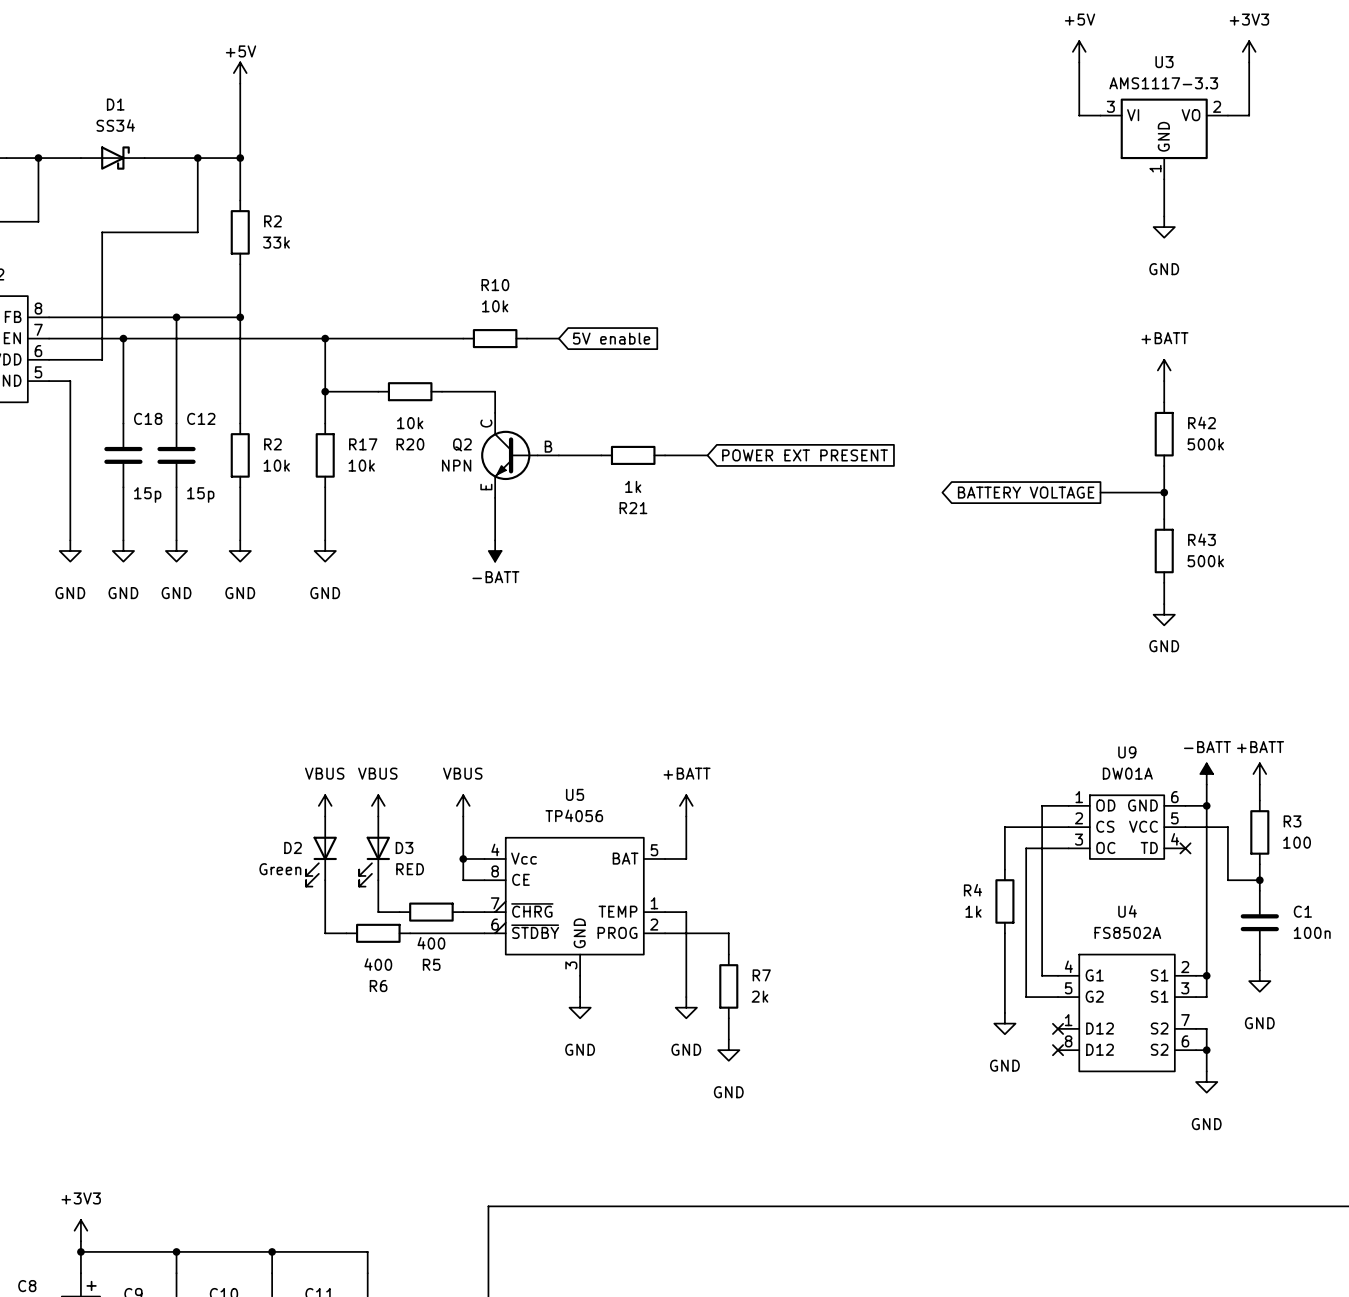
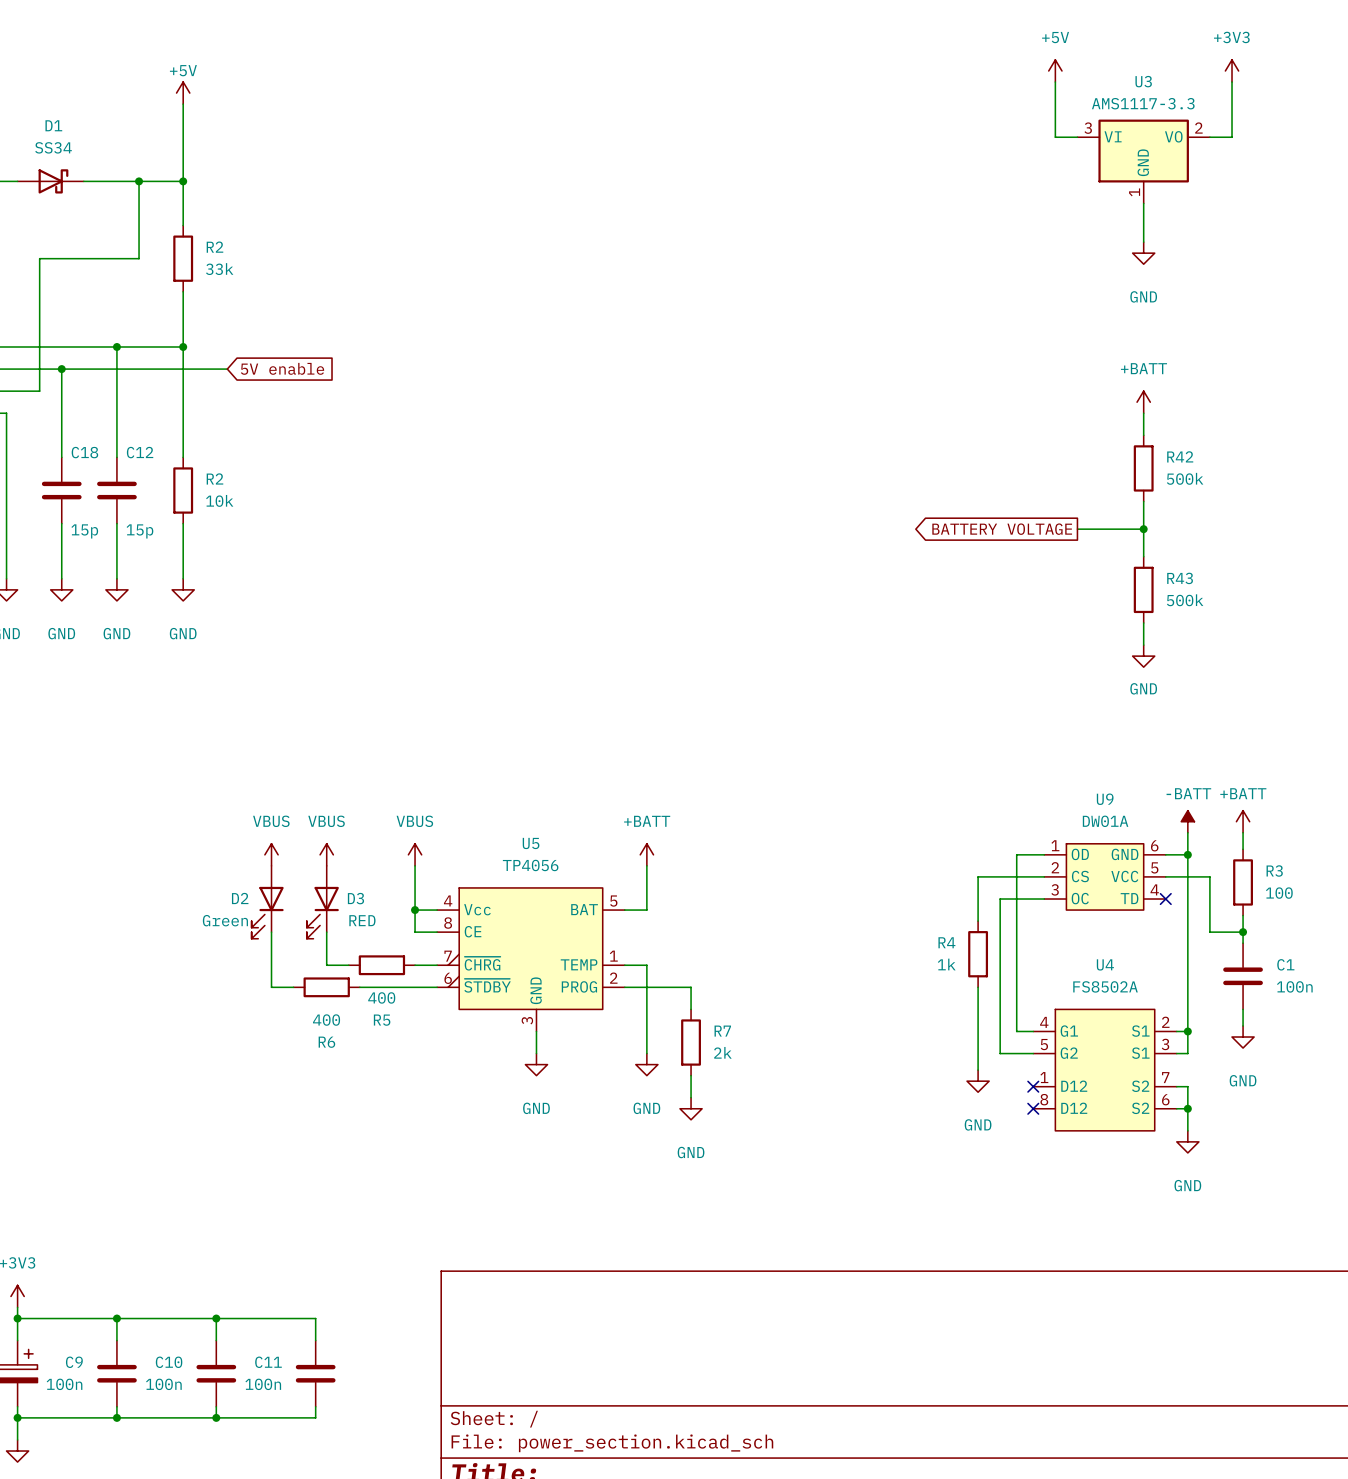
wire: (282, 338) (463, 338) -> none
wire: (325, 338) (325, 423) -> none
junction: (325, 338) -> none
global label: none -> 5V enable (282, 368)
R10: 10k (495, 338) -> none
wire: (527, 338) (558, 338) -> none
global label: 5V enable (611, 338) -> none
wire: (325, 391) (378, 391) -> none
junction: (325, 391) -> none
R20: 10k (410, 391) -> none
wire: (442, 391) (495, 391) (495, 412) -> none
R17: 10k (325, 455) -> none
Q2: NPN (519, 455) -> none
wire: (558, 455) (601, 455) -> none
R21: 1k (633, 455) -> none
wire: (665, 455) (707, 455) -> none
global label: POWER EXT PRESENT (805, 455) -> none
wire: (325, 487) (325, 540) -> none
wire: (495, 497) (495, 540) -> none
power symbol: GND (325, 550) -> none
power symbol: -BATT (495, 550) -> none

